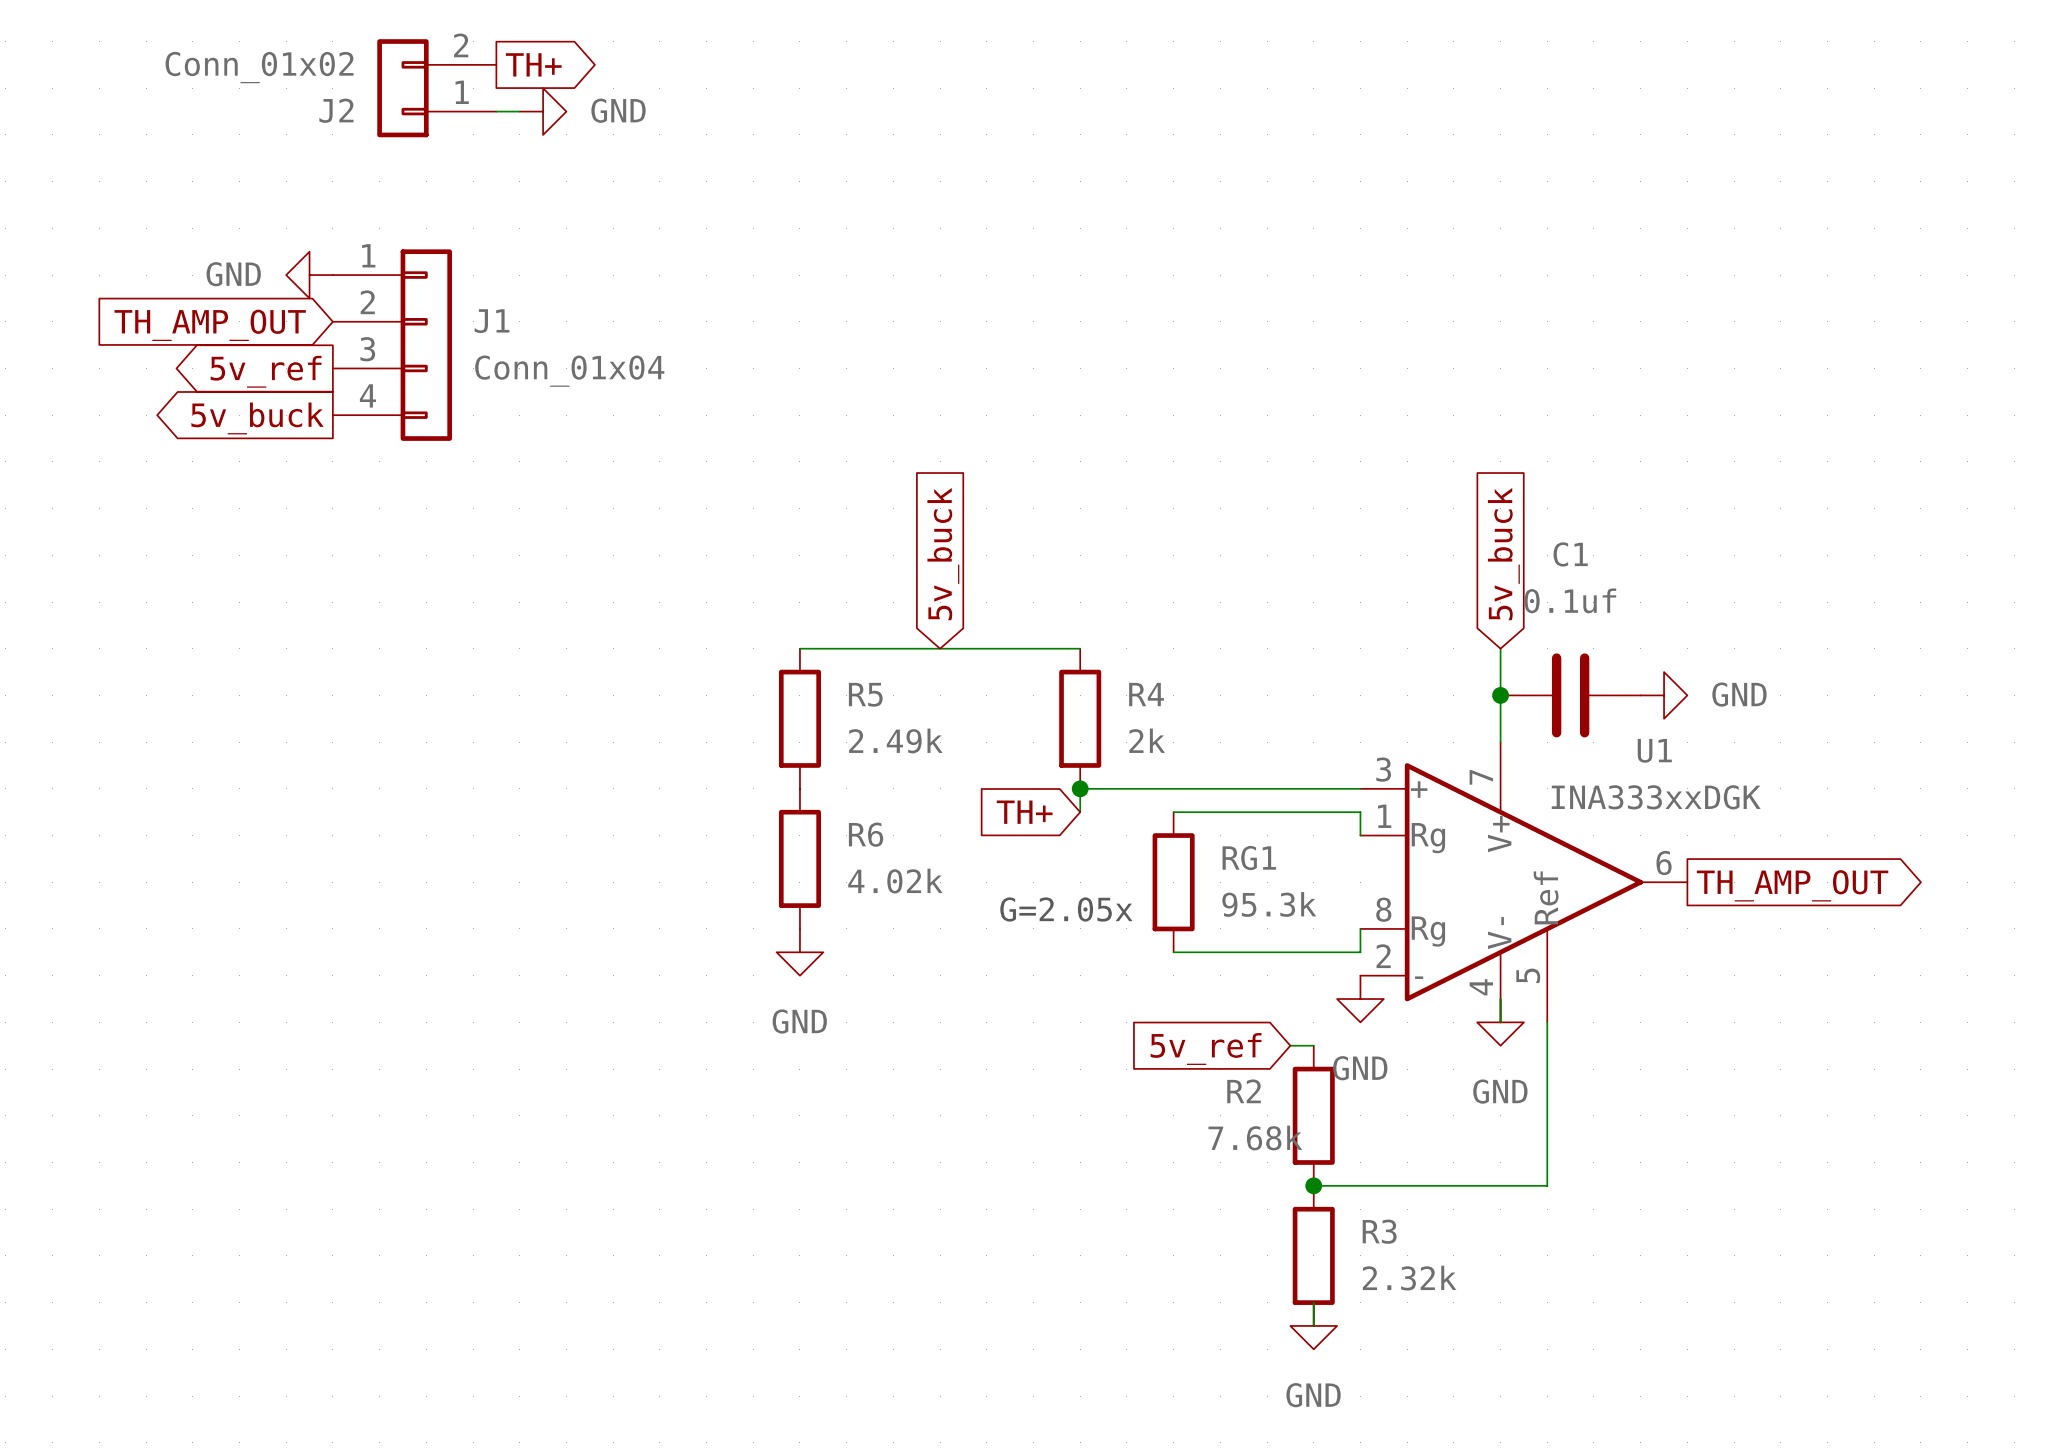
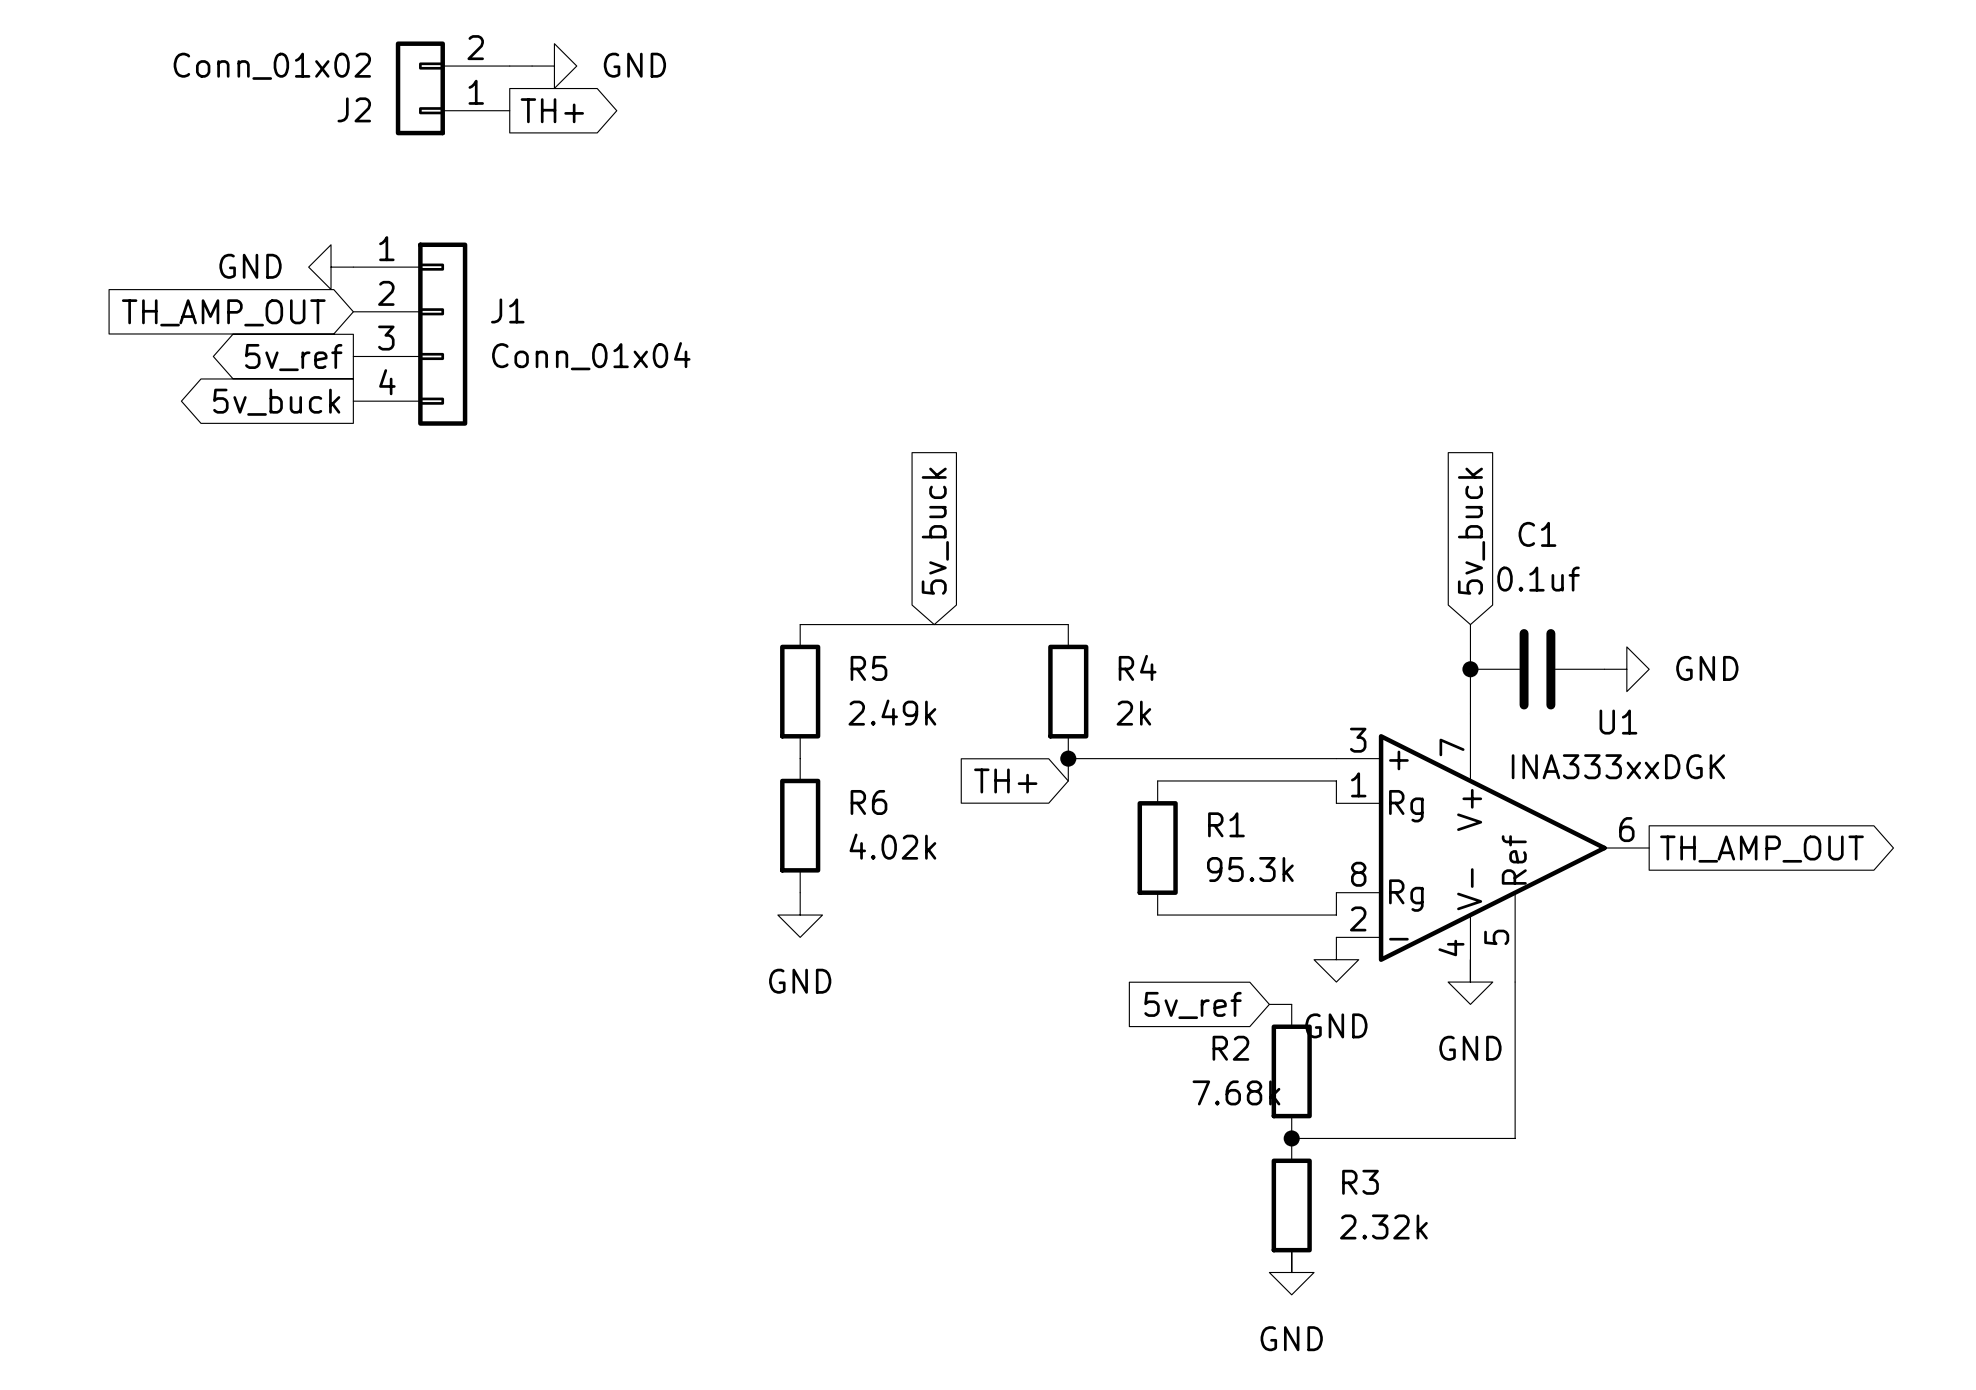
global label position: TH+ (533, 64) -> TH+ (552, 110)
wire: (496, 111) (519, 111) -> (509, 66) (532, 66)
power symbol position: GND (543, 111) -> GND (554, 66)
RG1 name: RG1 (1249, 858) -> R1 (1226, 824)
text: G=2.05x (1066, 909) -> none

